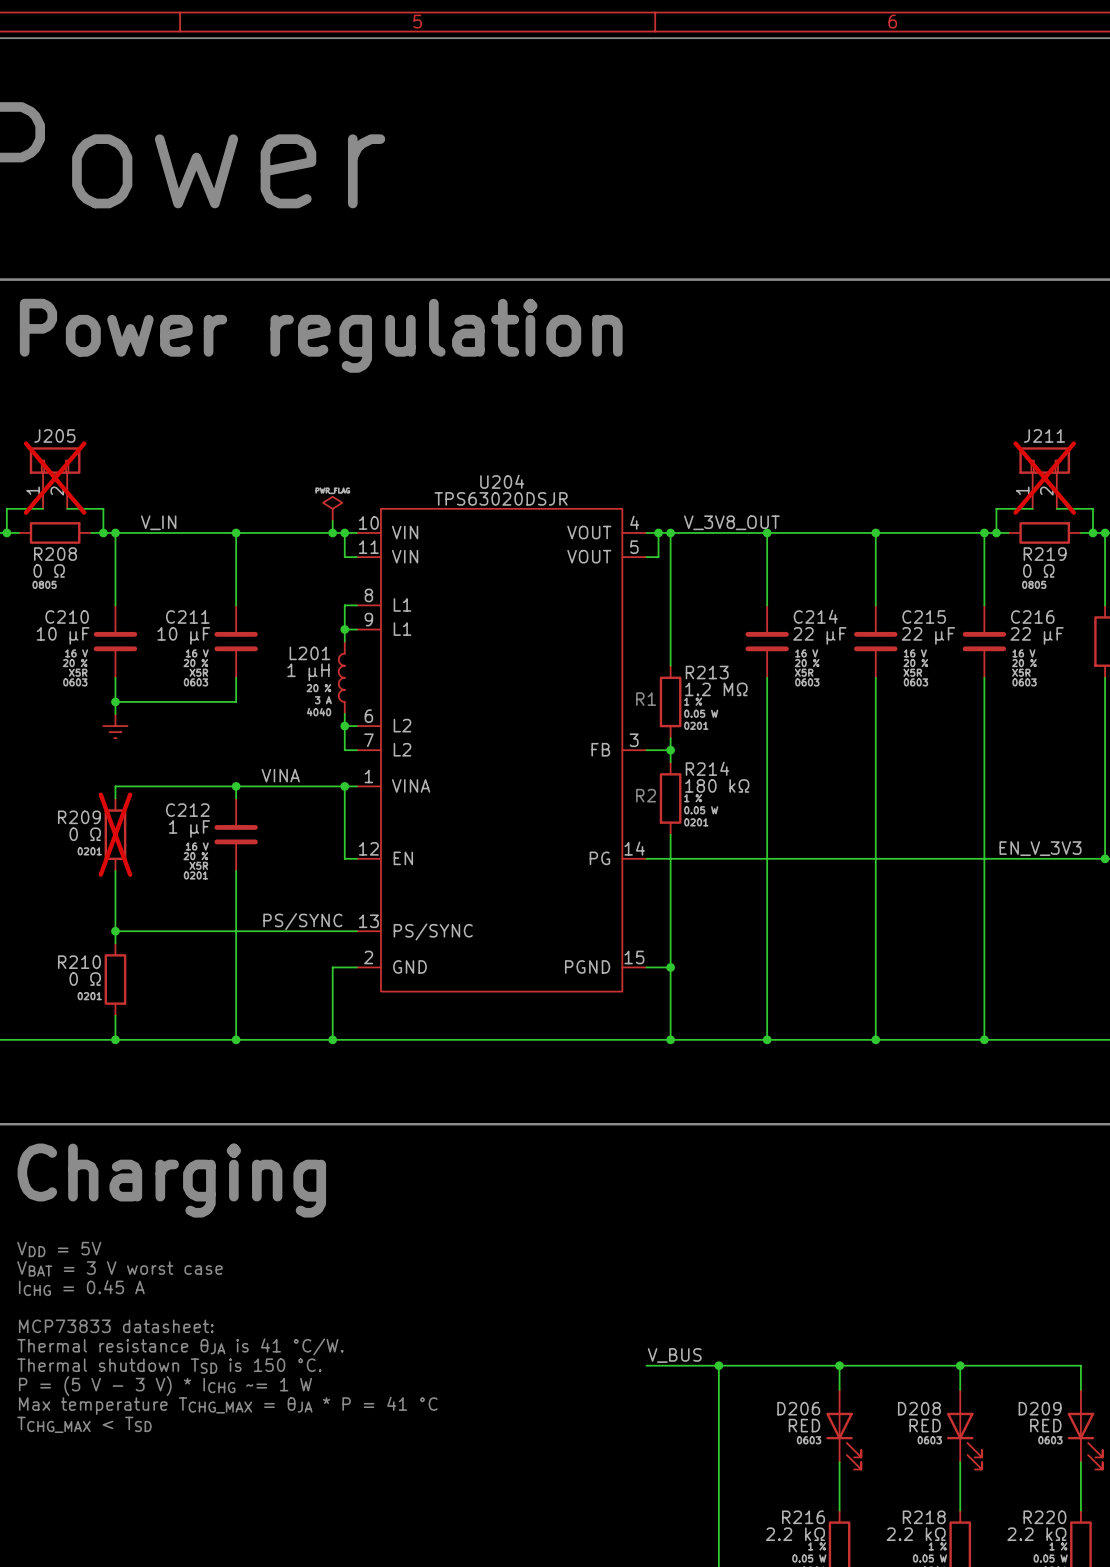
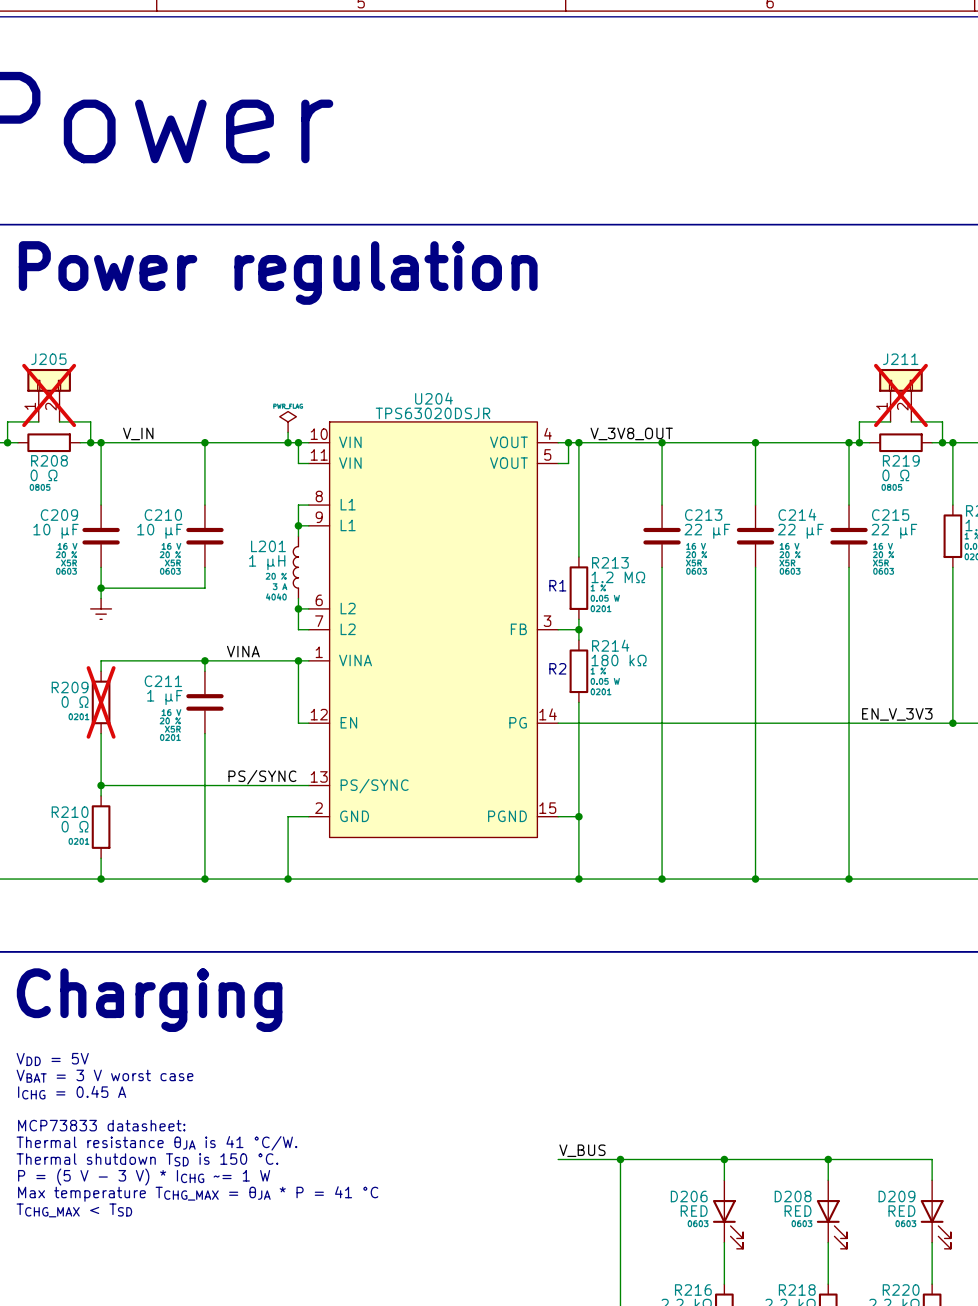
C214 name: C214 (815, 616) -> C213 (703, 515)
C210 name: C210 (67, 617) -> C209 (59, 515)
C211 name: C211 (187, 617) -> C210 (163, 515)
C215 name: C215 (924, 617) -> C214 (797, 514)
C216 name: C216 (1032, 617) -> C215 (890, 515)
C212 name: C212 (187, 810) -> C211 (163, 681)

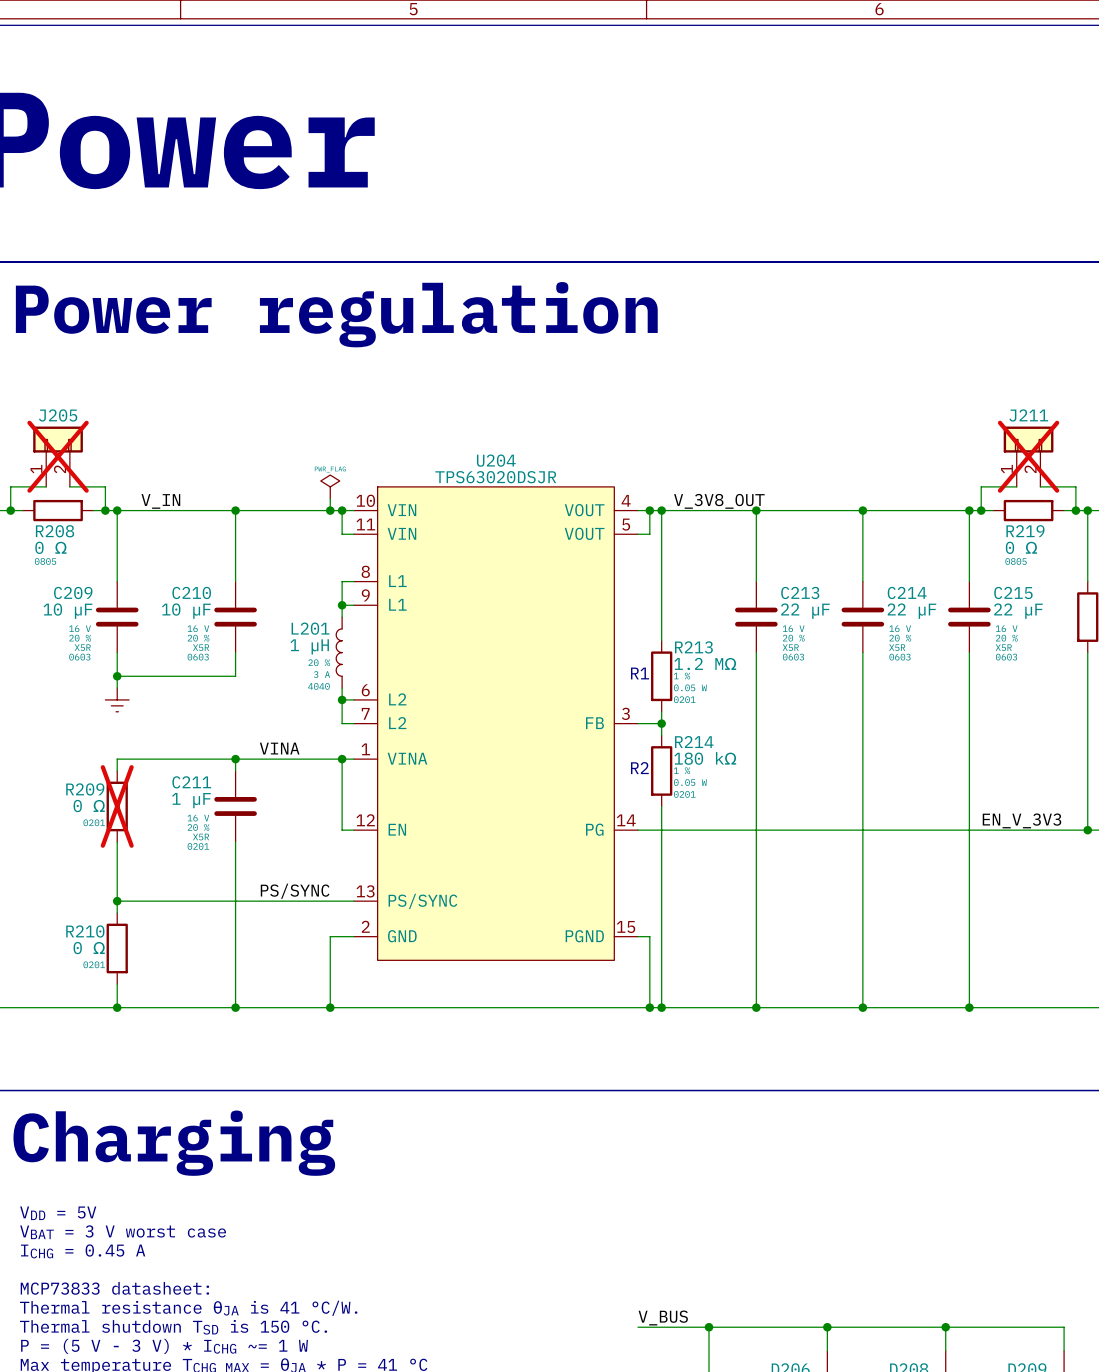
wire: (568, 816) (578, 816) -> (649, 936) (649, 1007)
junction: (578, 816) -> none
junction: none -> (649, 1007)

